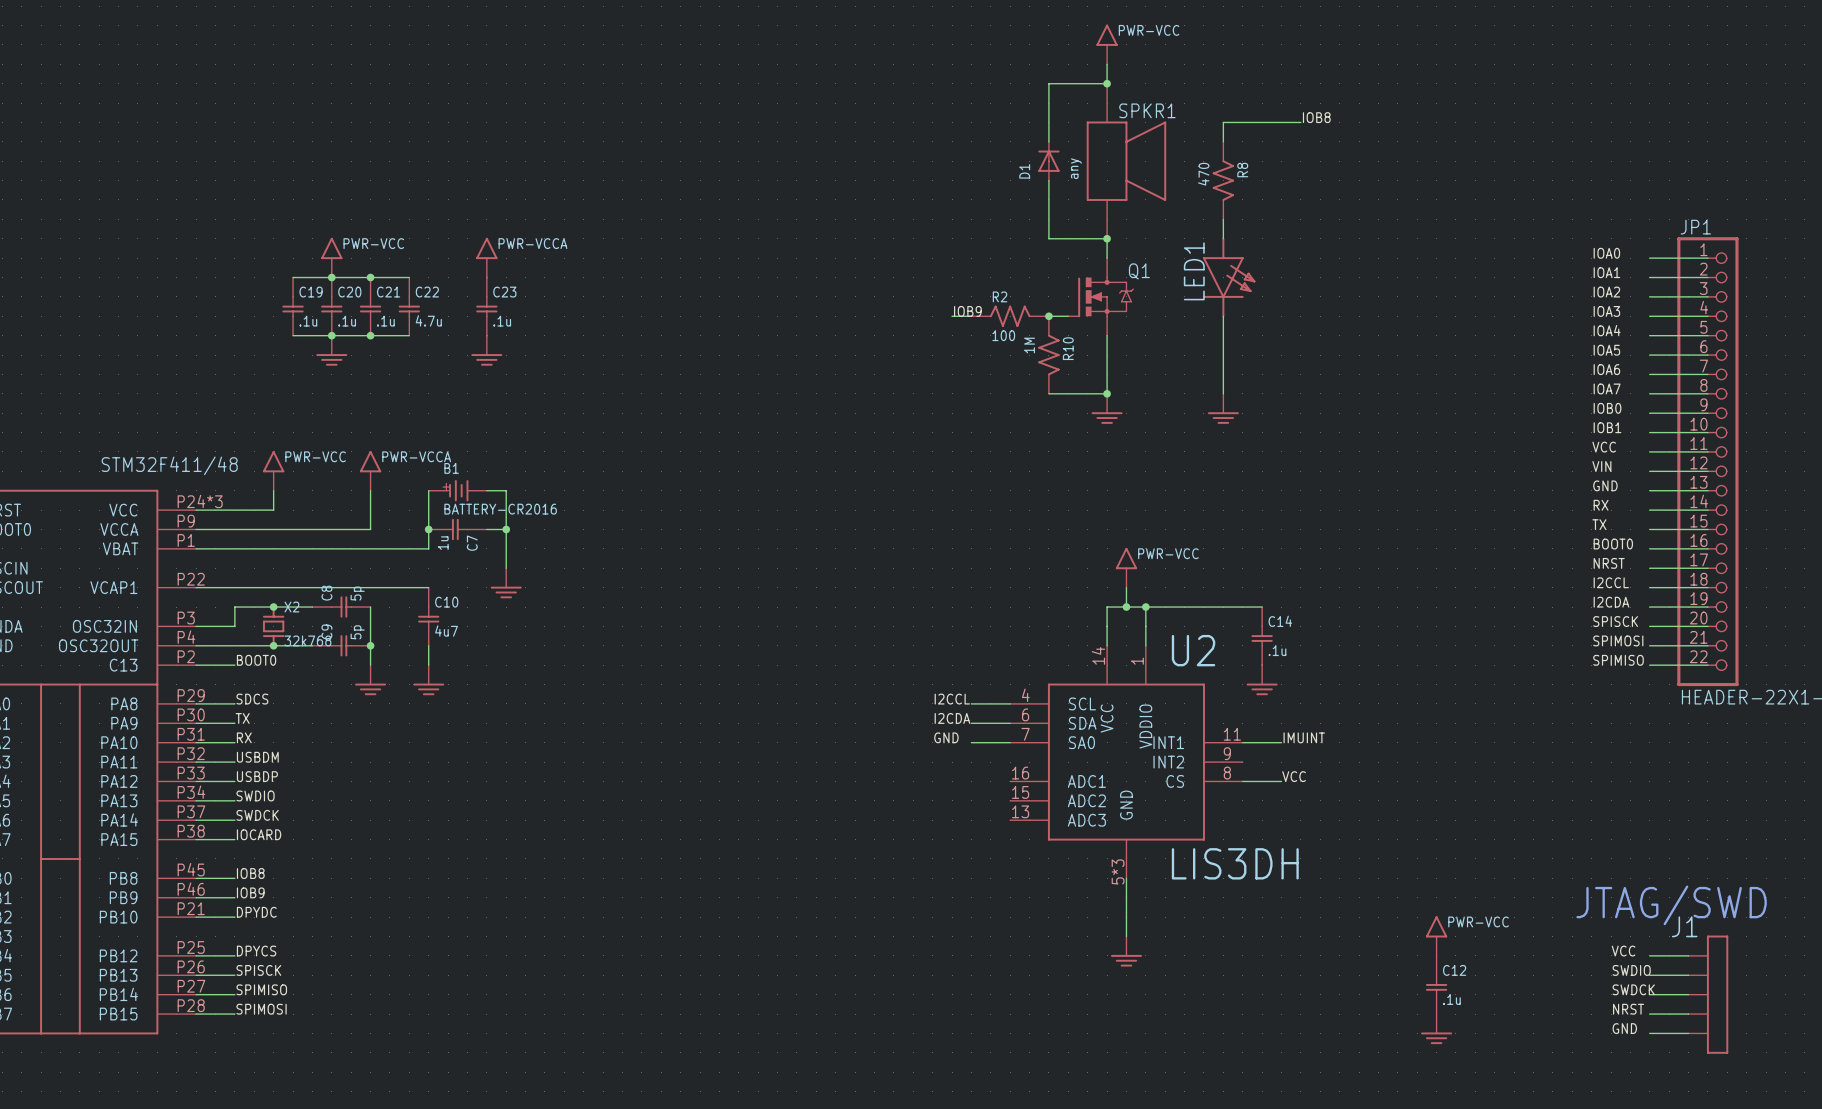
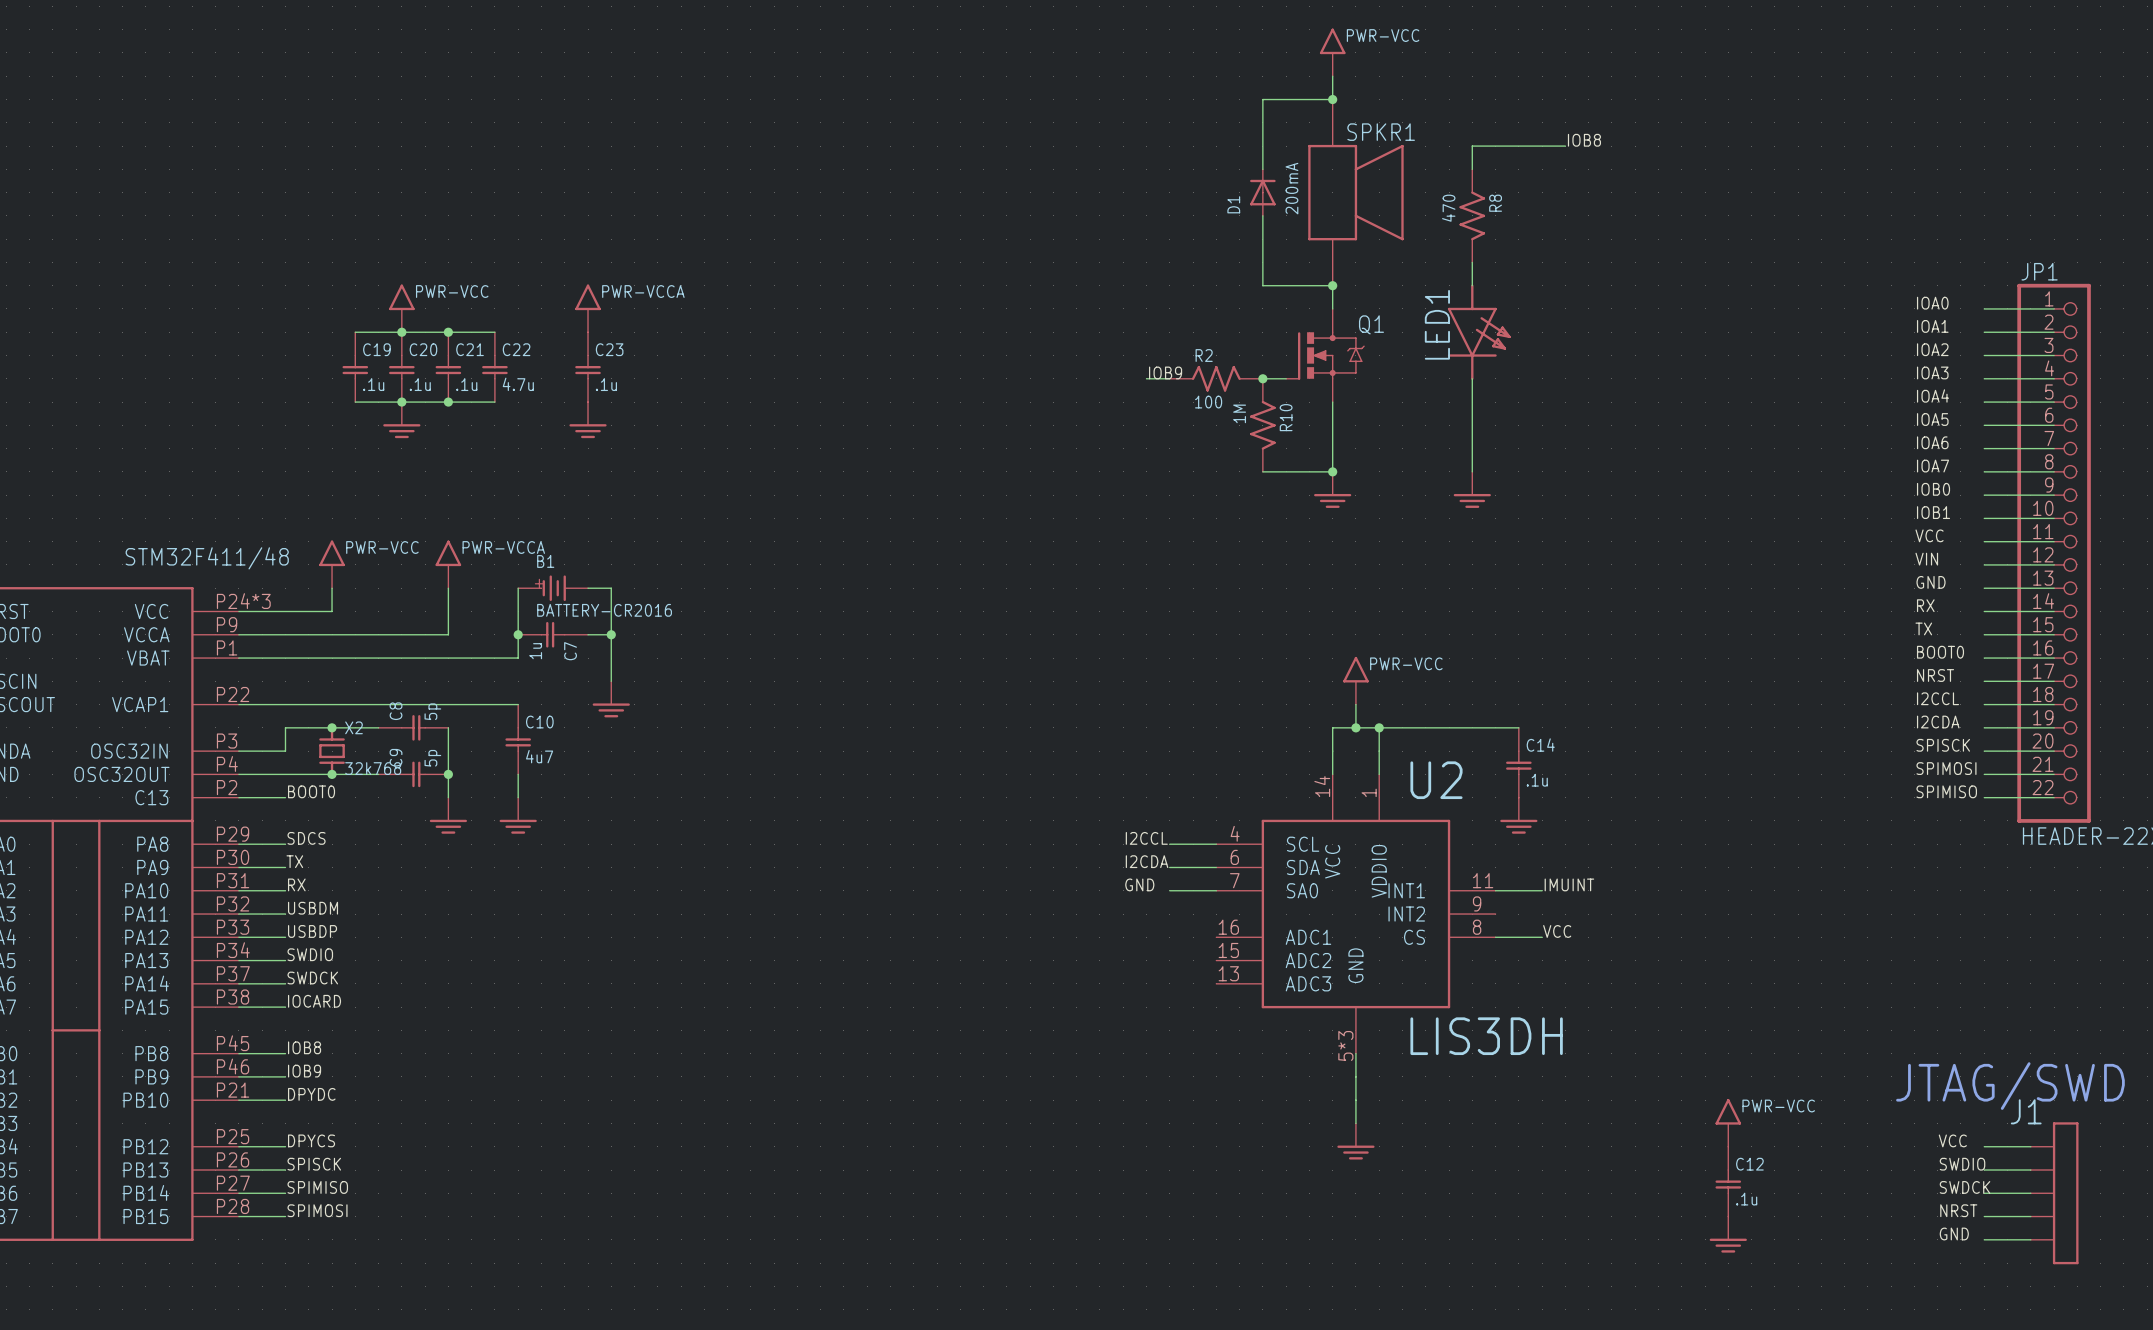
D1 value: any (1076, 168) -> 200mA (1291, 188)

